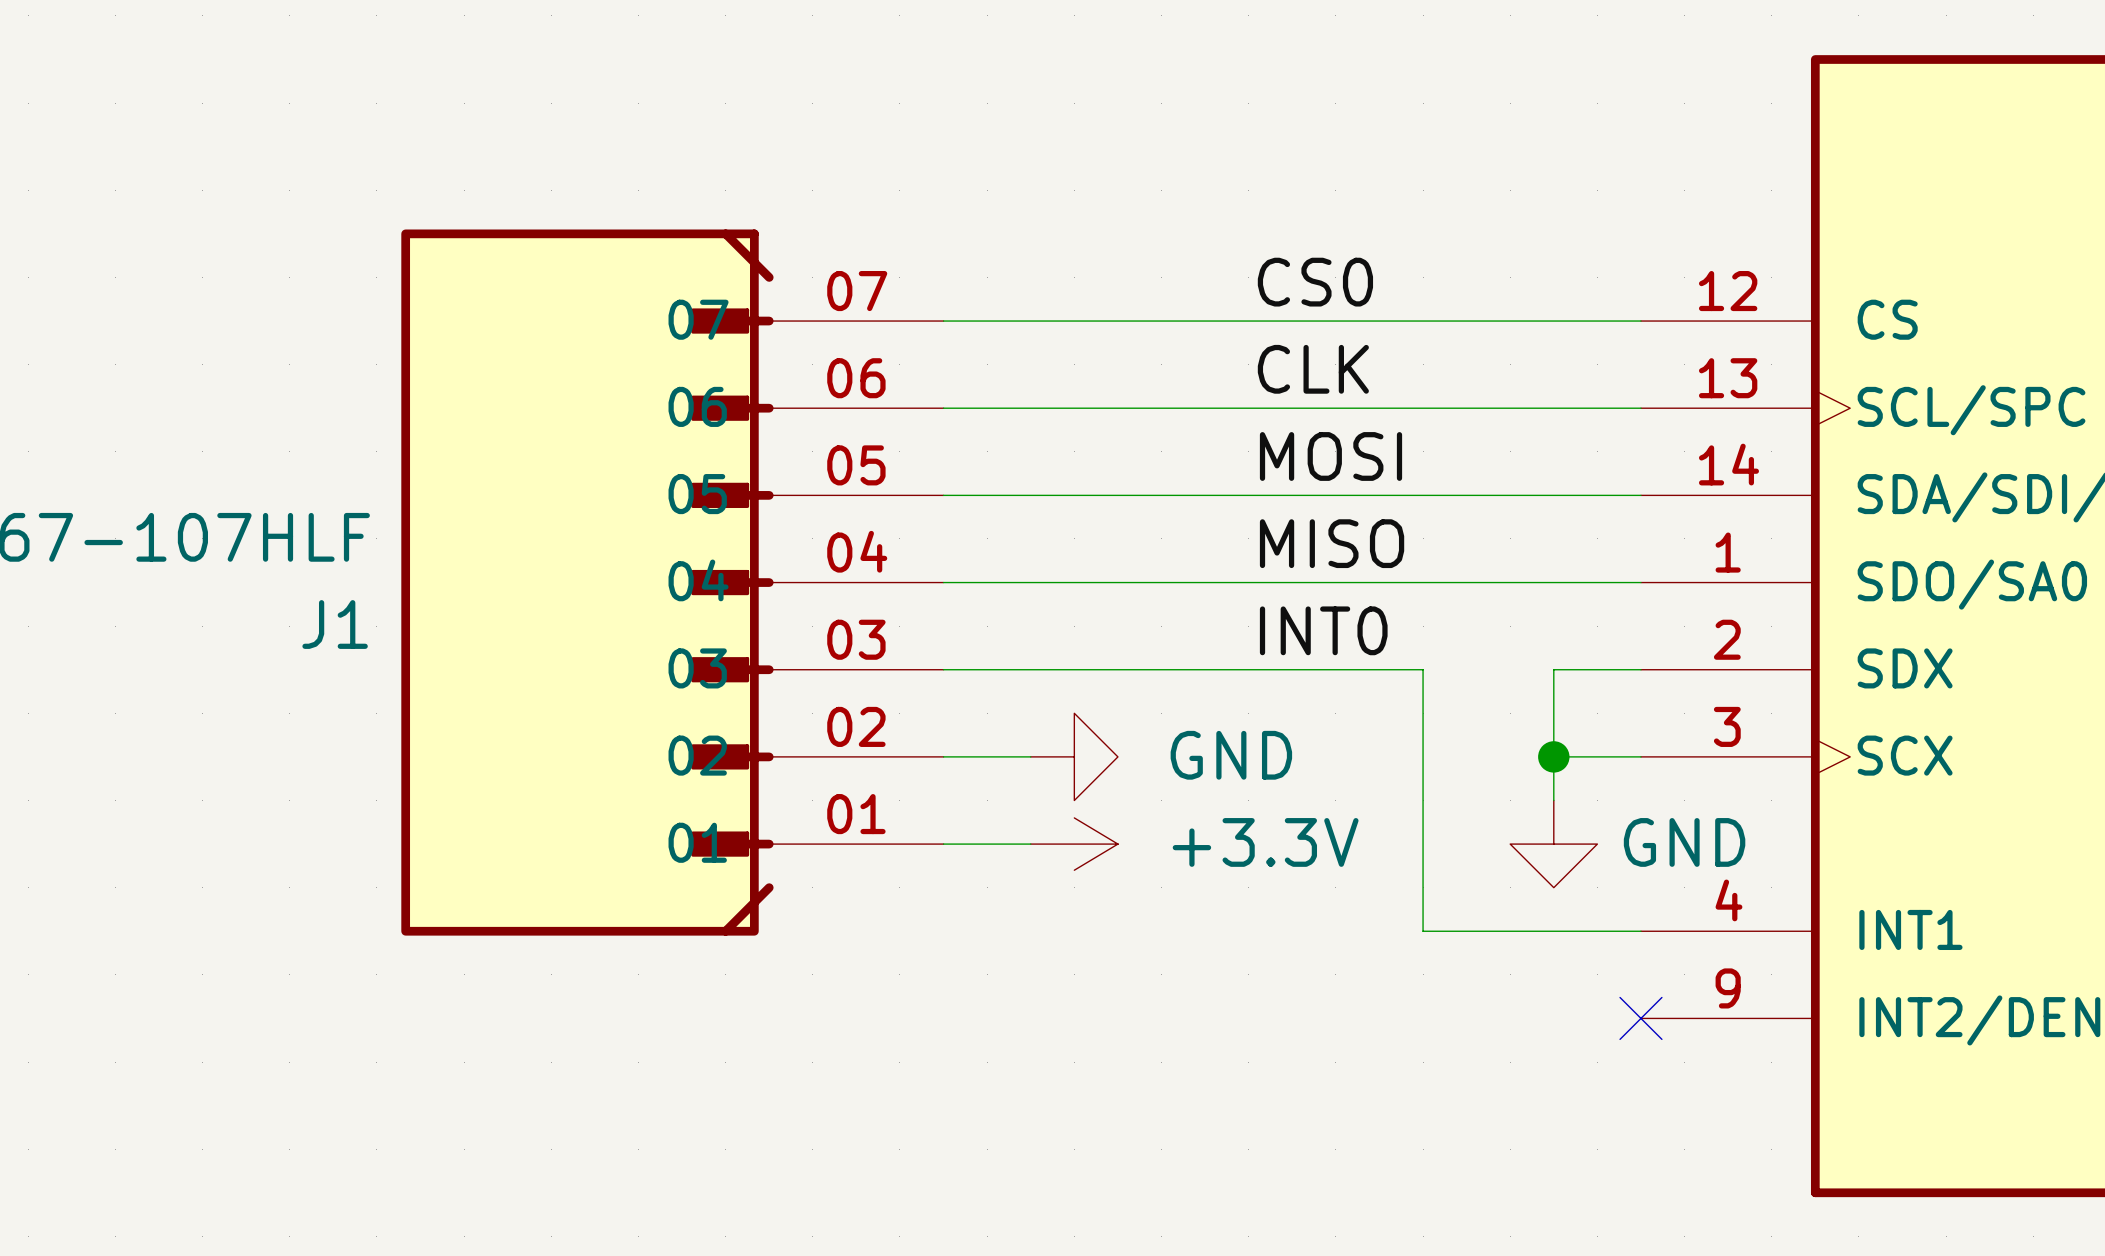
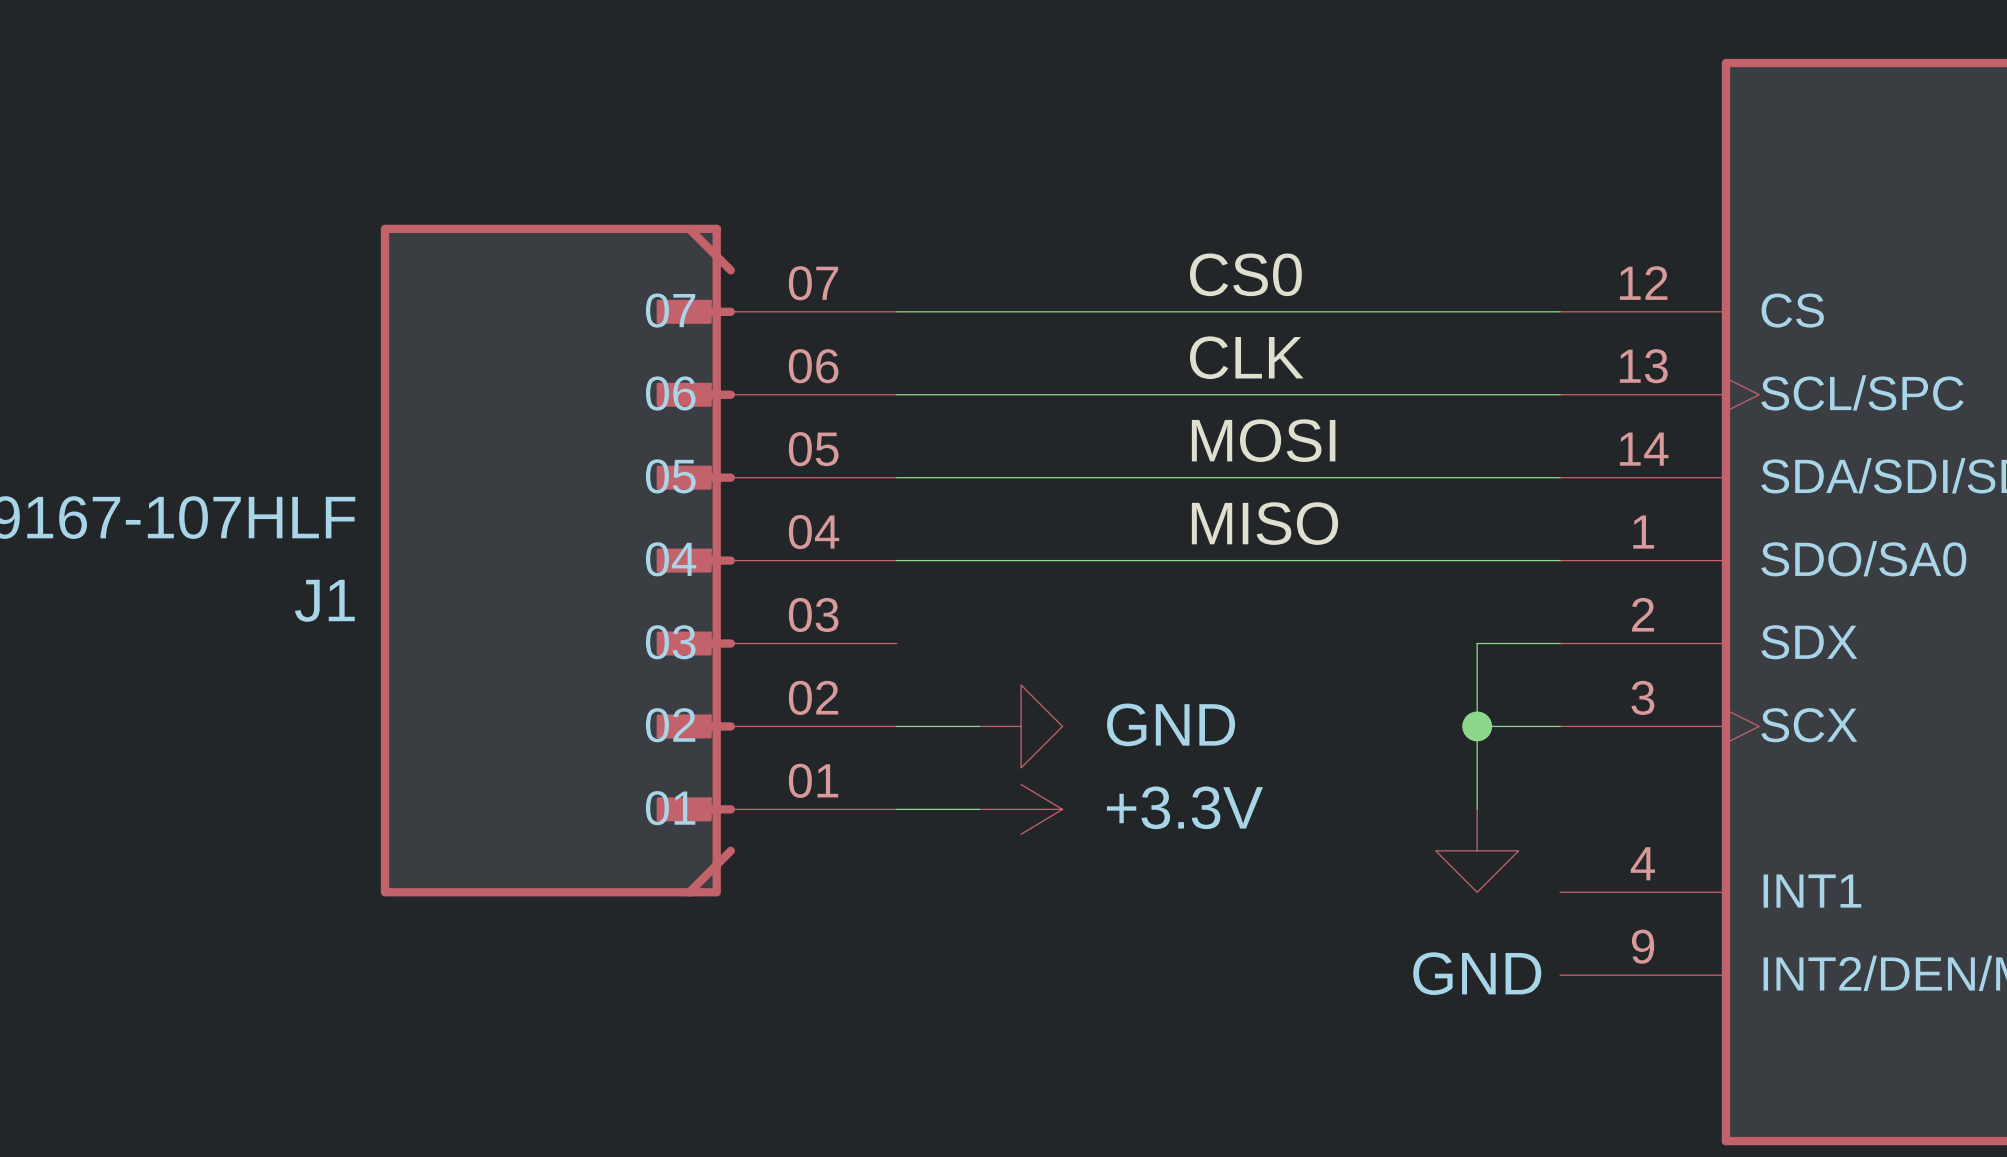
label: INT0 (1323, 630) -> none
wire: (943, 669) (1423, 669) (1423, 931) (1640, 931) -> none
power symbol text position: GND (1684, 842) -> GND (1477, 973)
power symbol position: GND (1553, 844) -> GND (1477, 850)
no-connect mark: (1640, 1018) -> none

